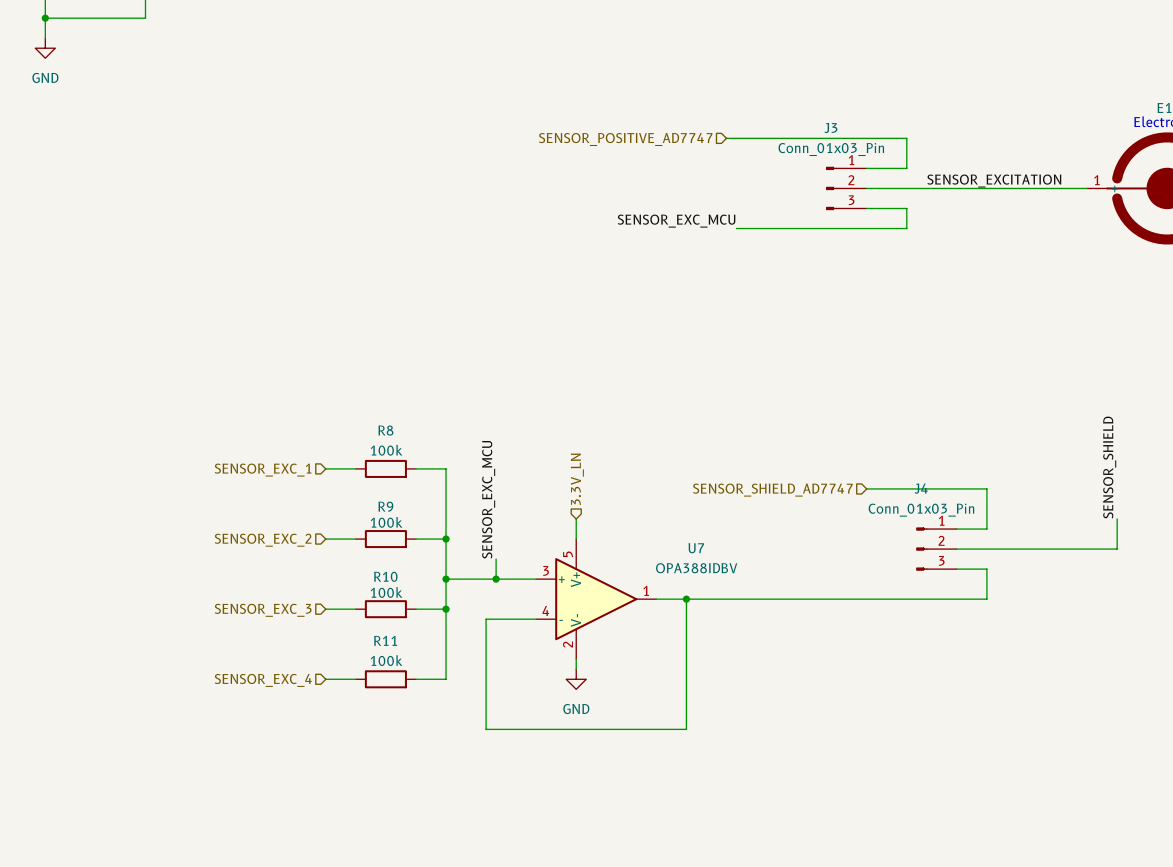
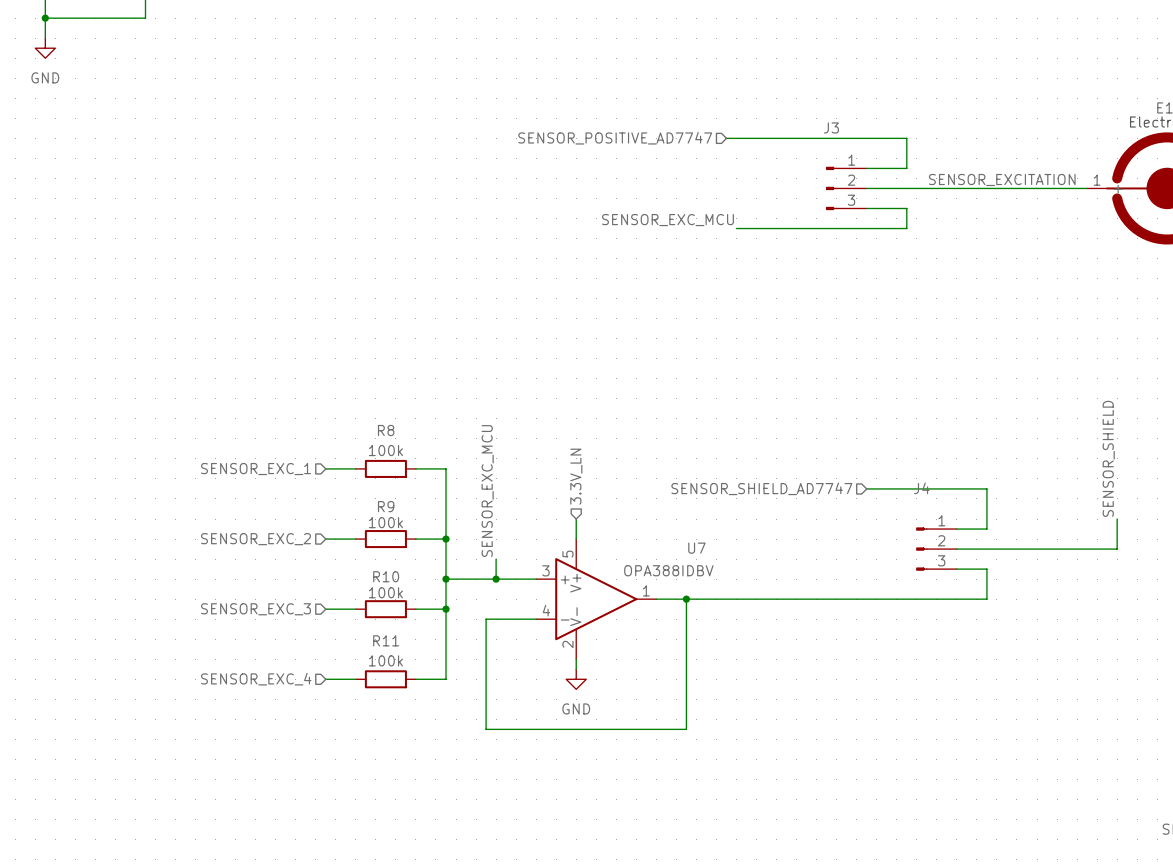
J3 value: Conn_01x03_Pin (831, 149) -> none
J4 value: Conn_01x03_Pin (921, 510) -> none
U7 value: OPA388IDBV (696, 568) -> none
U7 text: none -> OPA388IDBV (668, 570)

